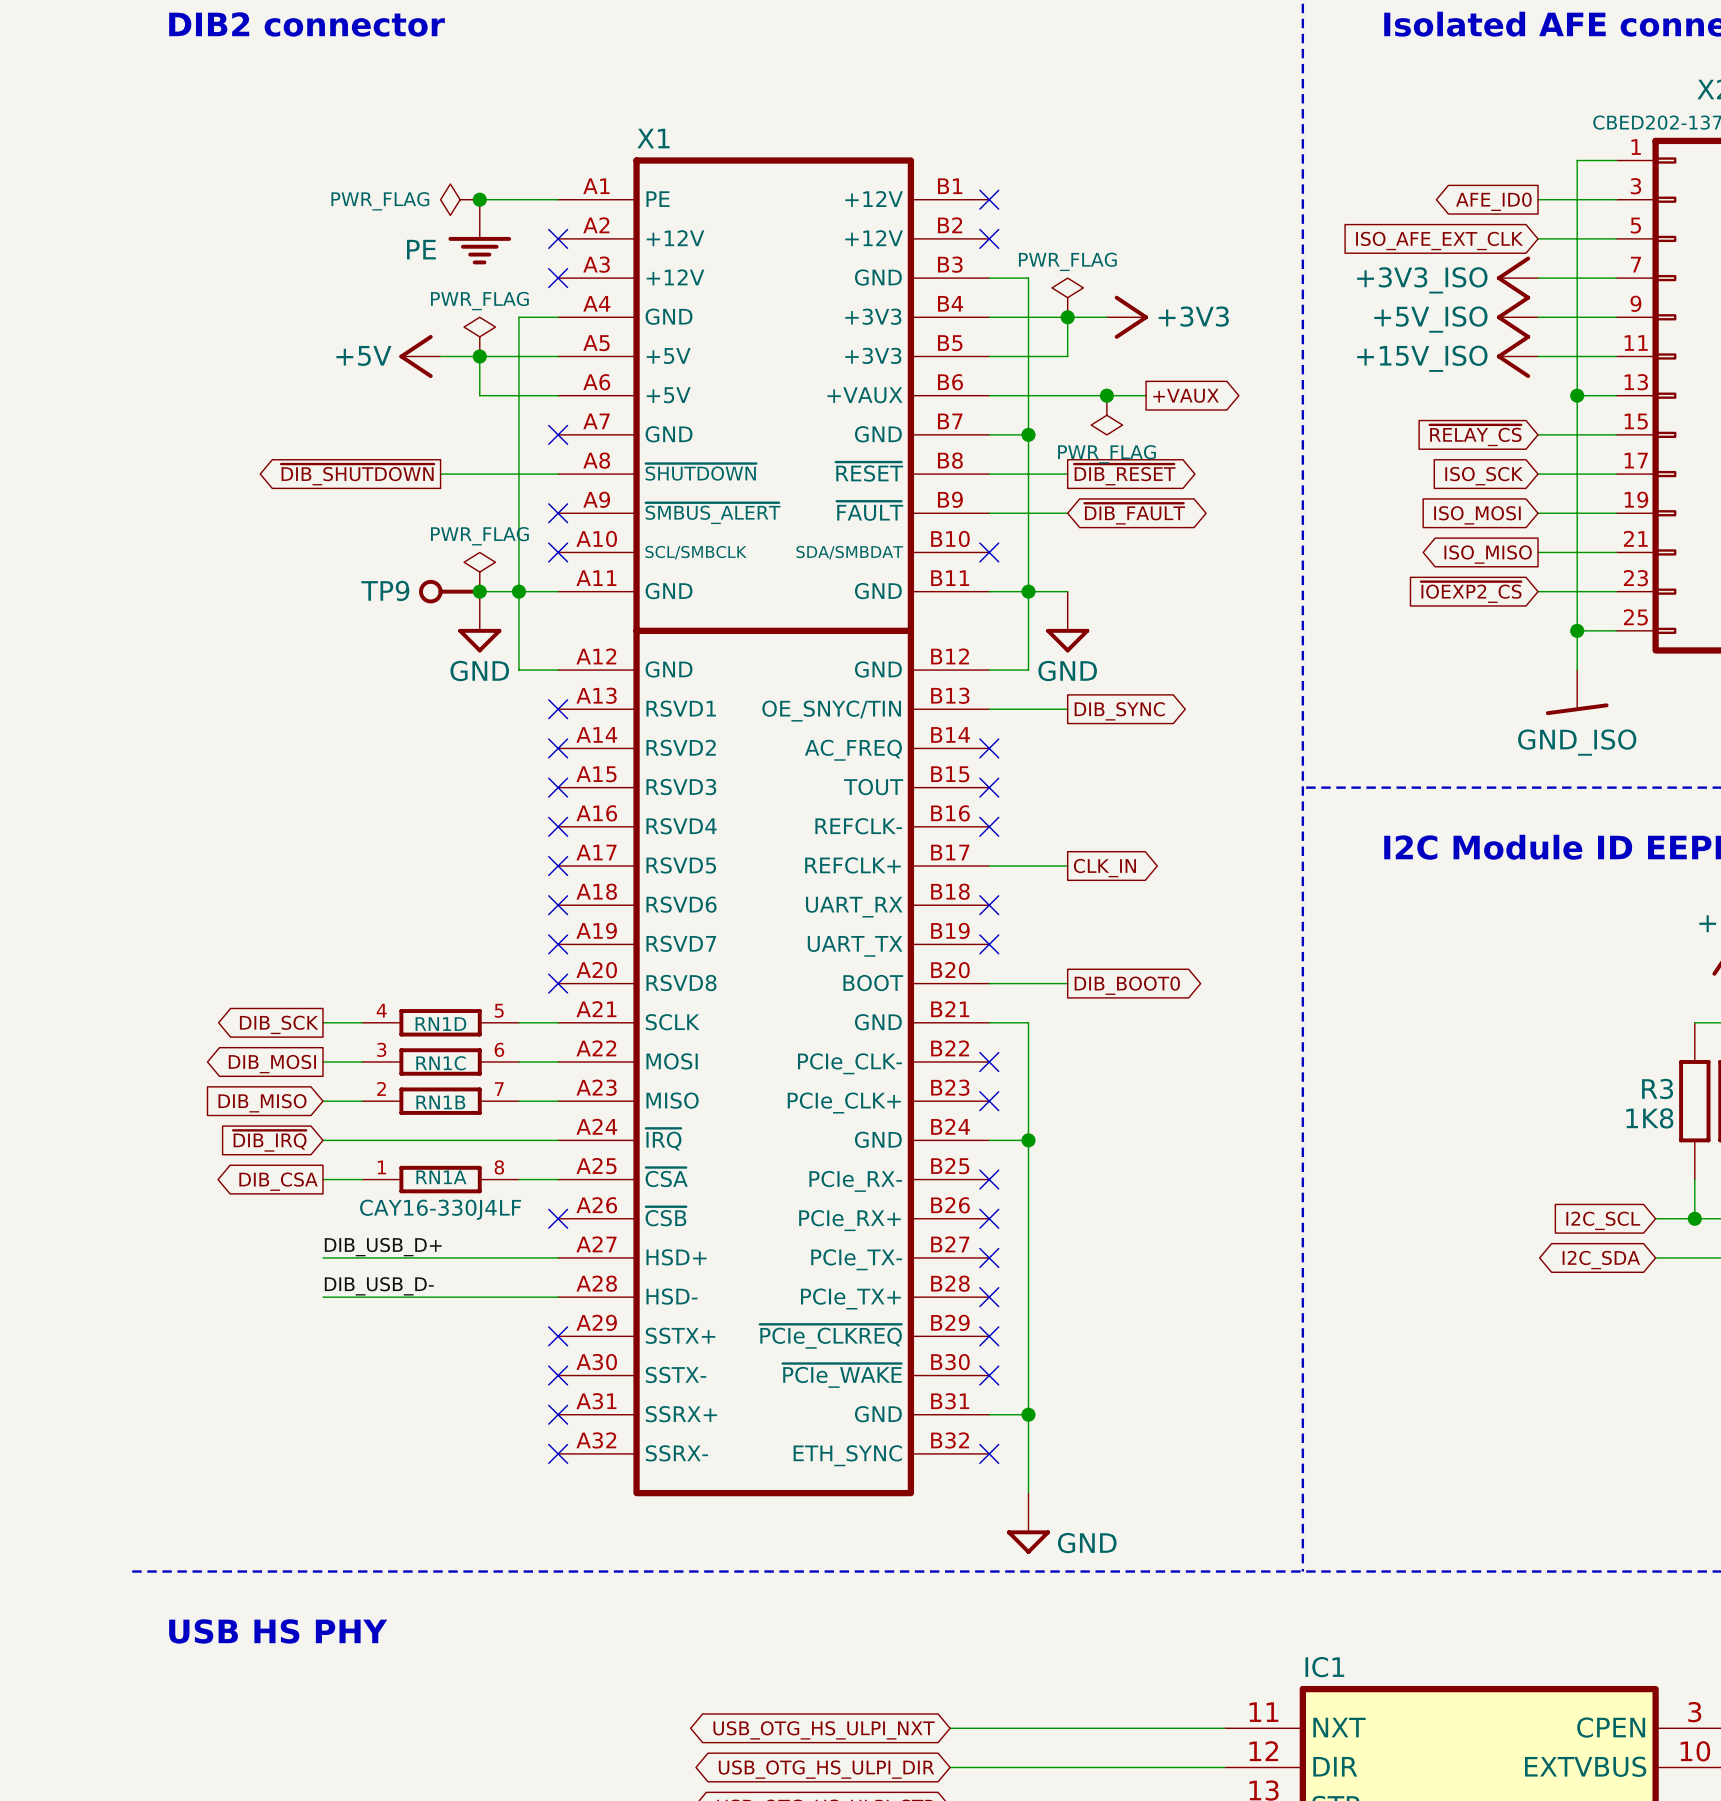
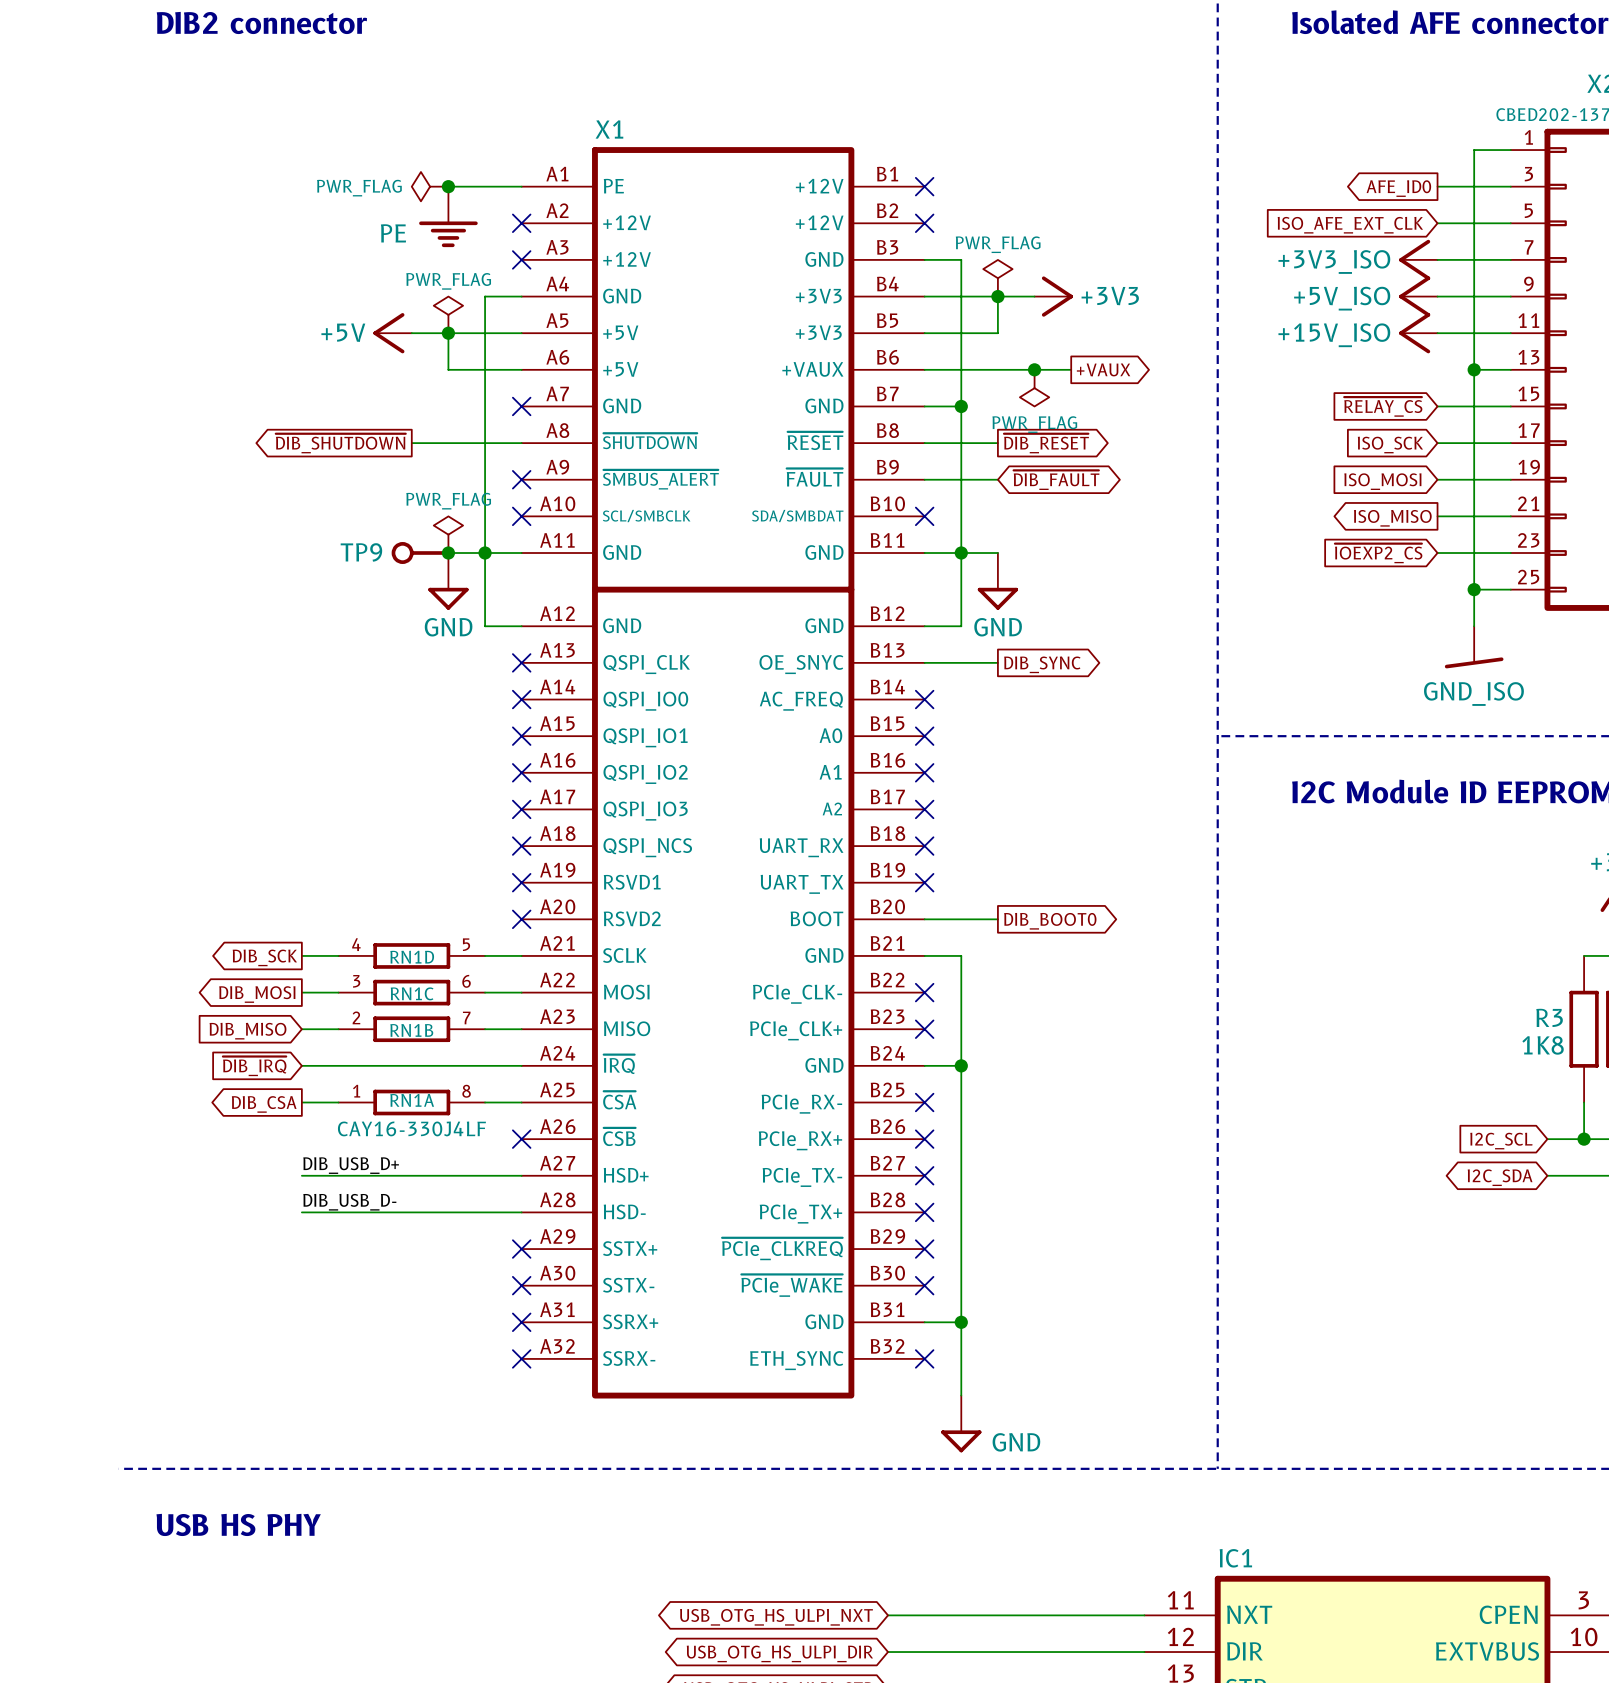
X1 symbol: [558, 157, 990, 1497] -> [521, 147, 925, 1399]
wire: (989, 866) (1067, 866) -> none
no-connect mark: none -> (924, 809)
global label: CLK_IN (1104, 868) -> none

